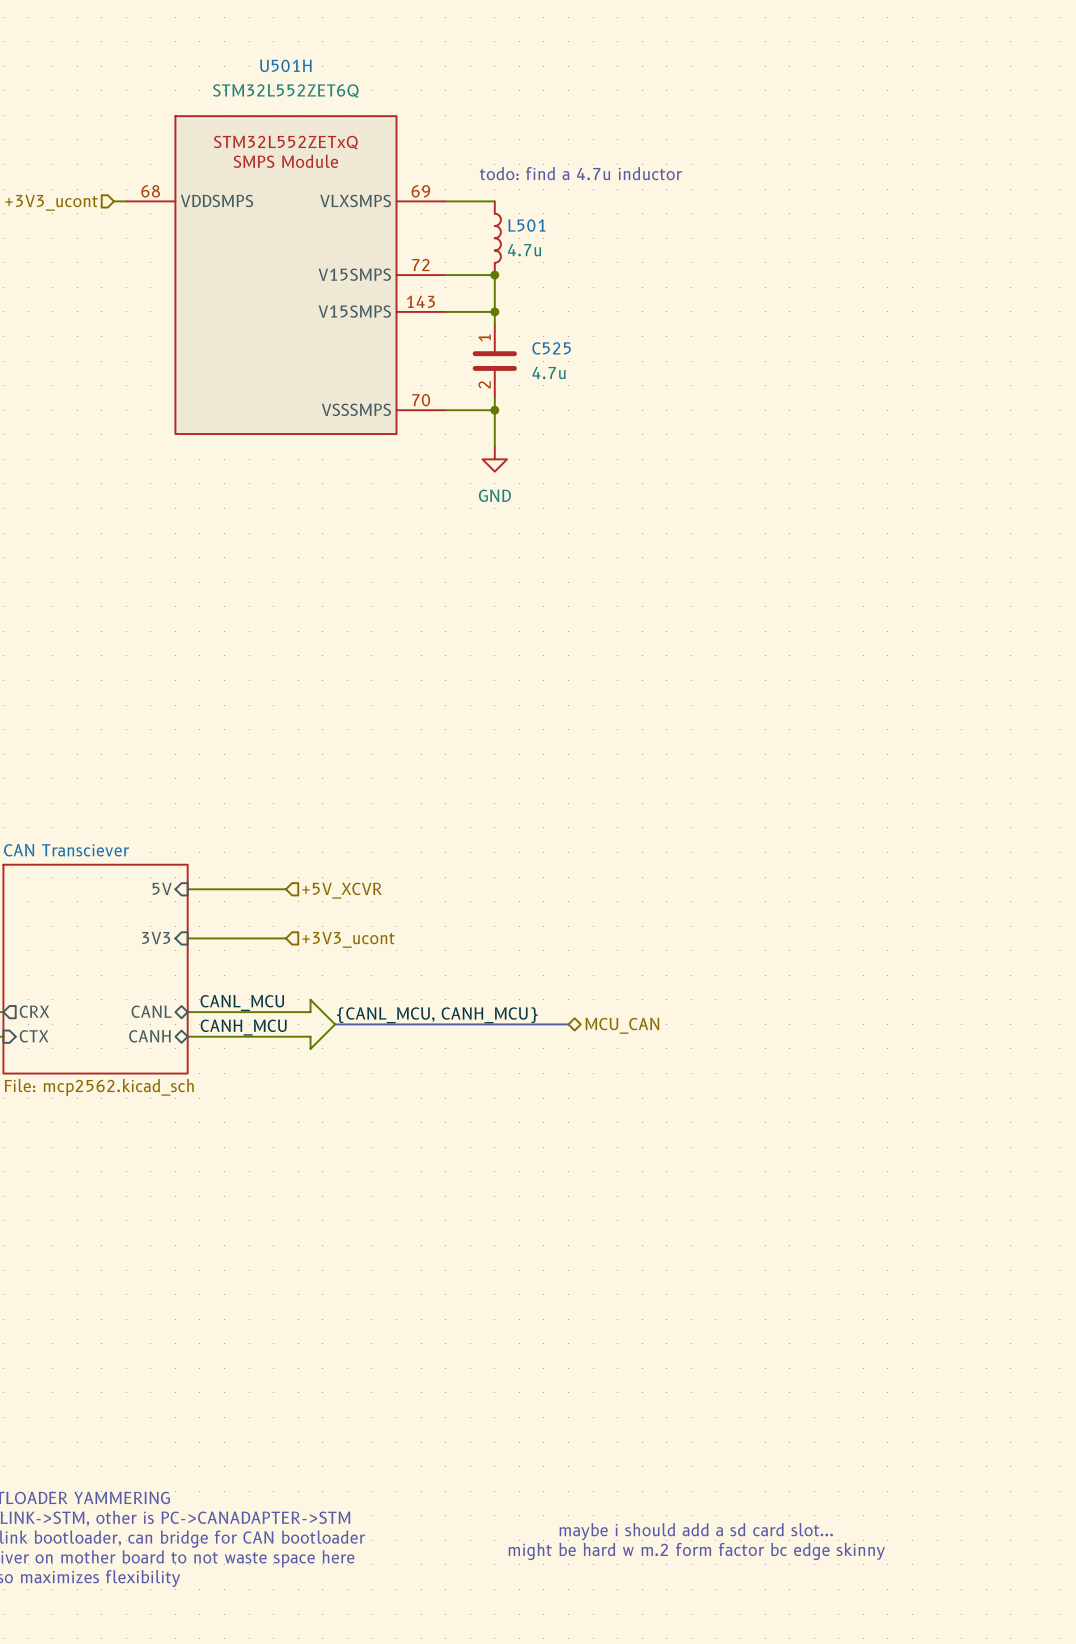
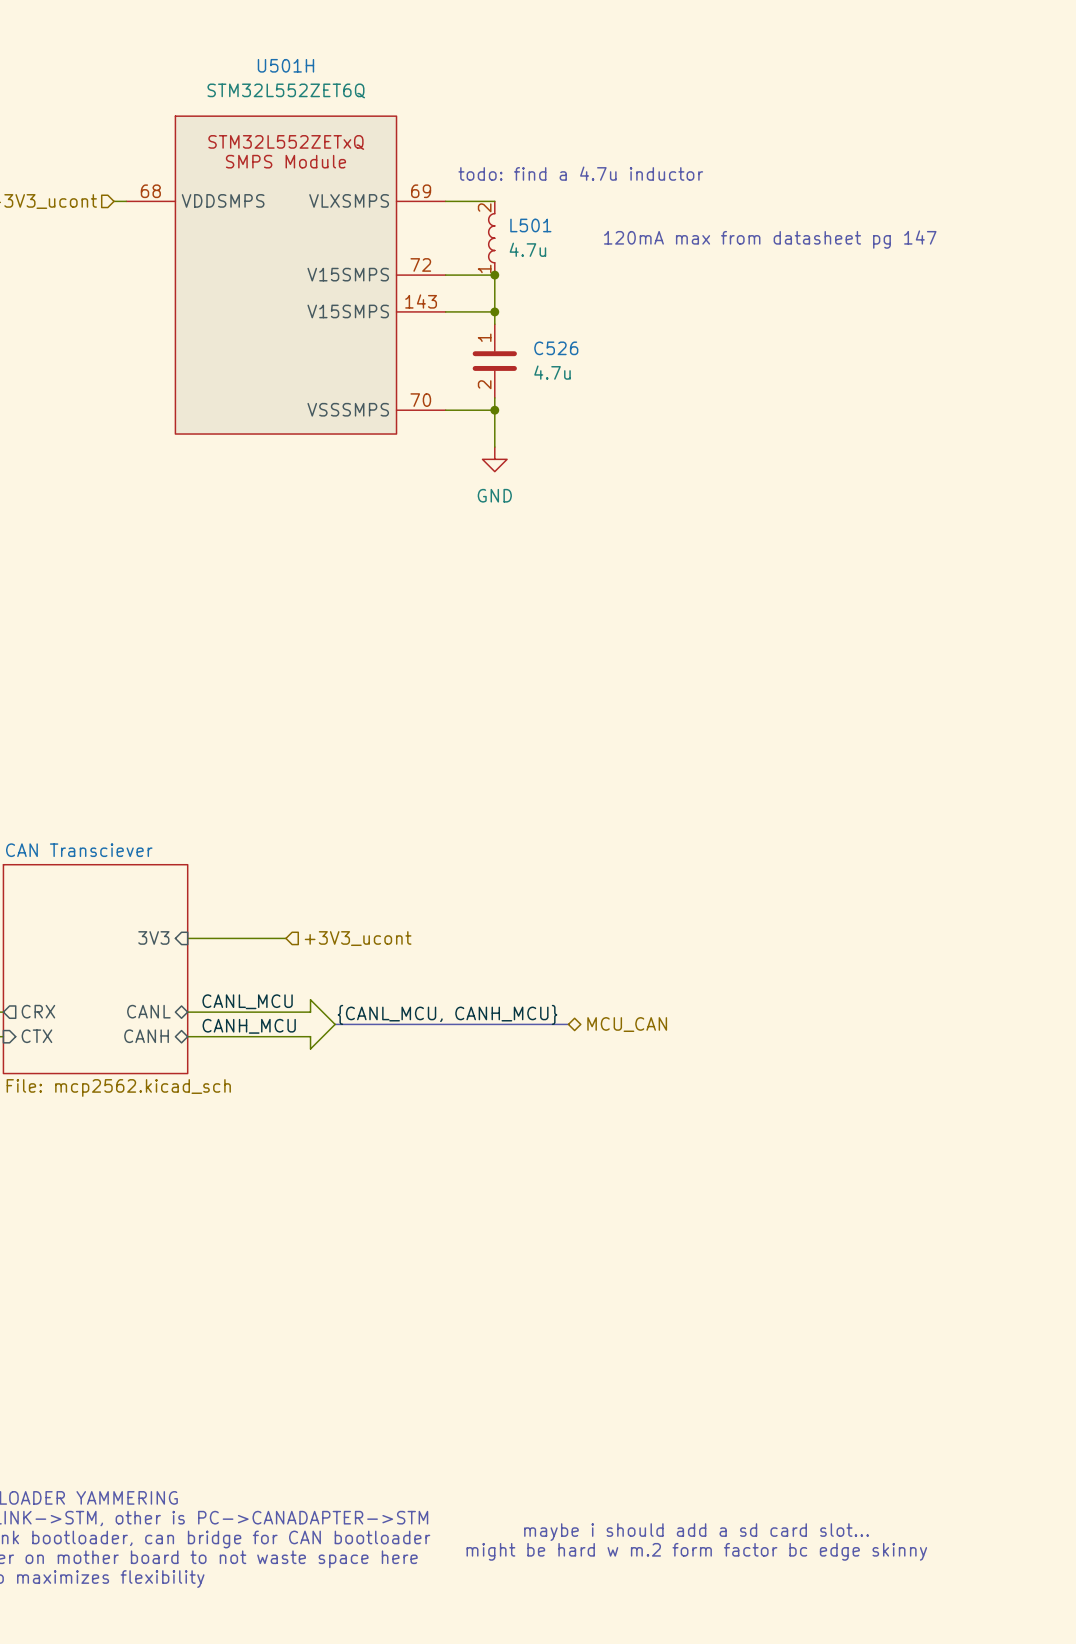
L501 symbol: [494, 201, 501, 276] -> [488, 201, 495, 276]
text: none -> 120mA max from datasheet pg 147 (770, 239)
C525 name: C525 (551, 348) -> C526 (556, 348)
sheet pin: 5V (162, 888) -> none
wire: (187, 889) (285, 889) -> none
hierarchical label: +5V_XCVR (342, 890) -> none

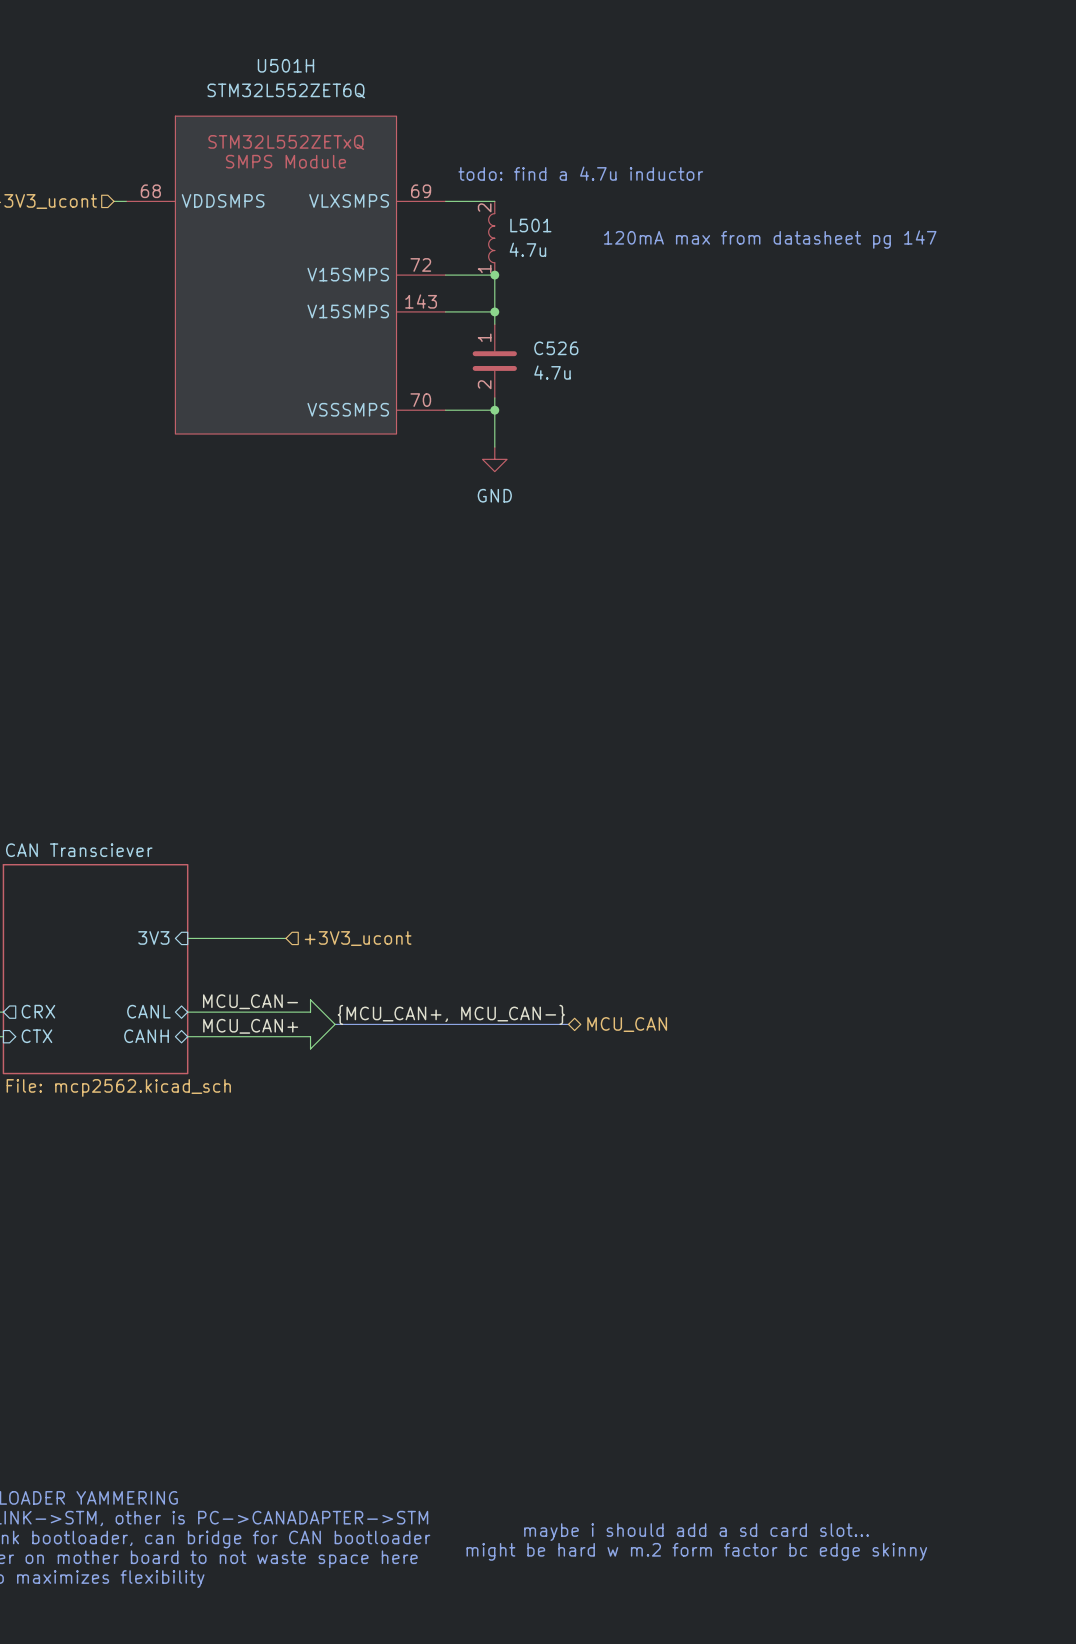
label: CANL_MCU (247, 1001) -> MCU_CAN- (250, 1001)
label: {CANL_MCU, CANH_MCU} (447, 1014) -> {MCU_CAN+, MCU_CAN-} (451, 1014)
label: CANH_MCU (249, 1026) -> MCU_CAN+ (250, 1026)

